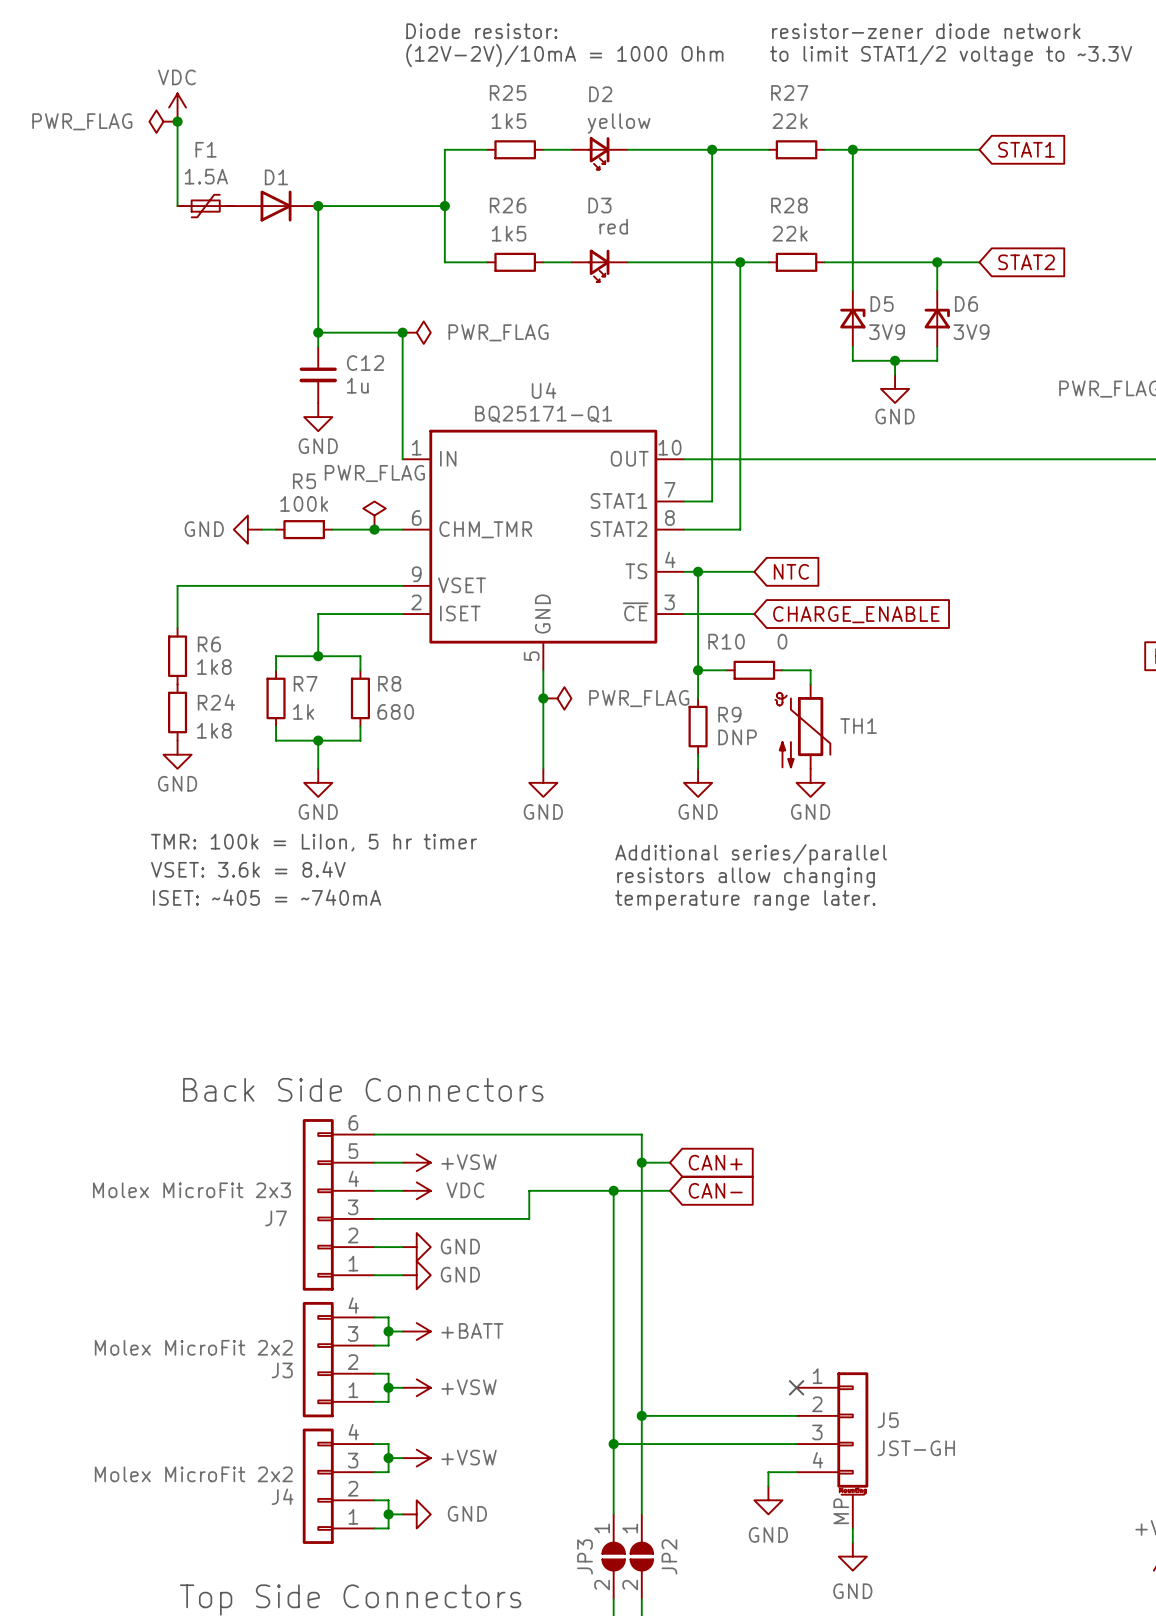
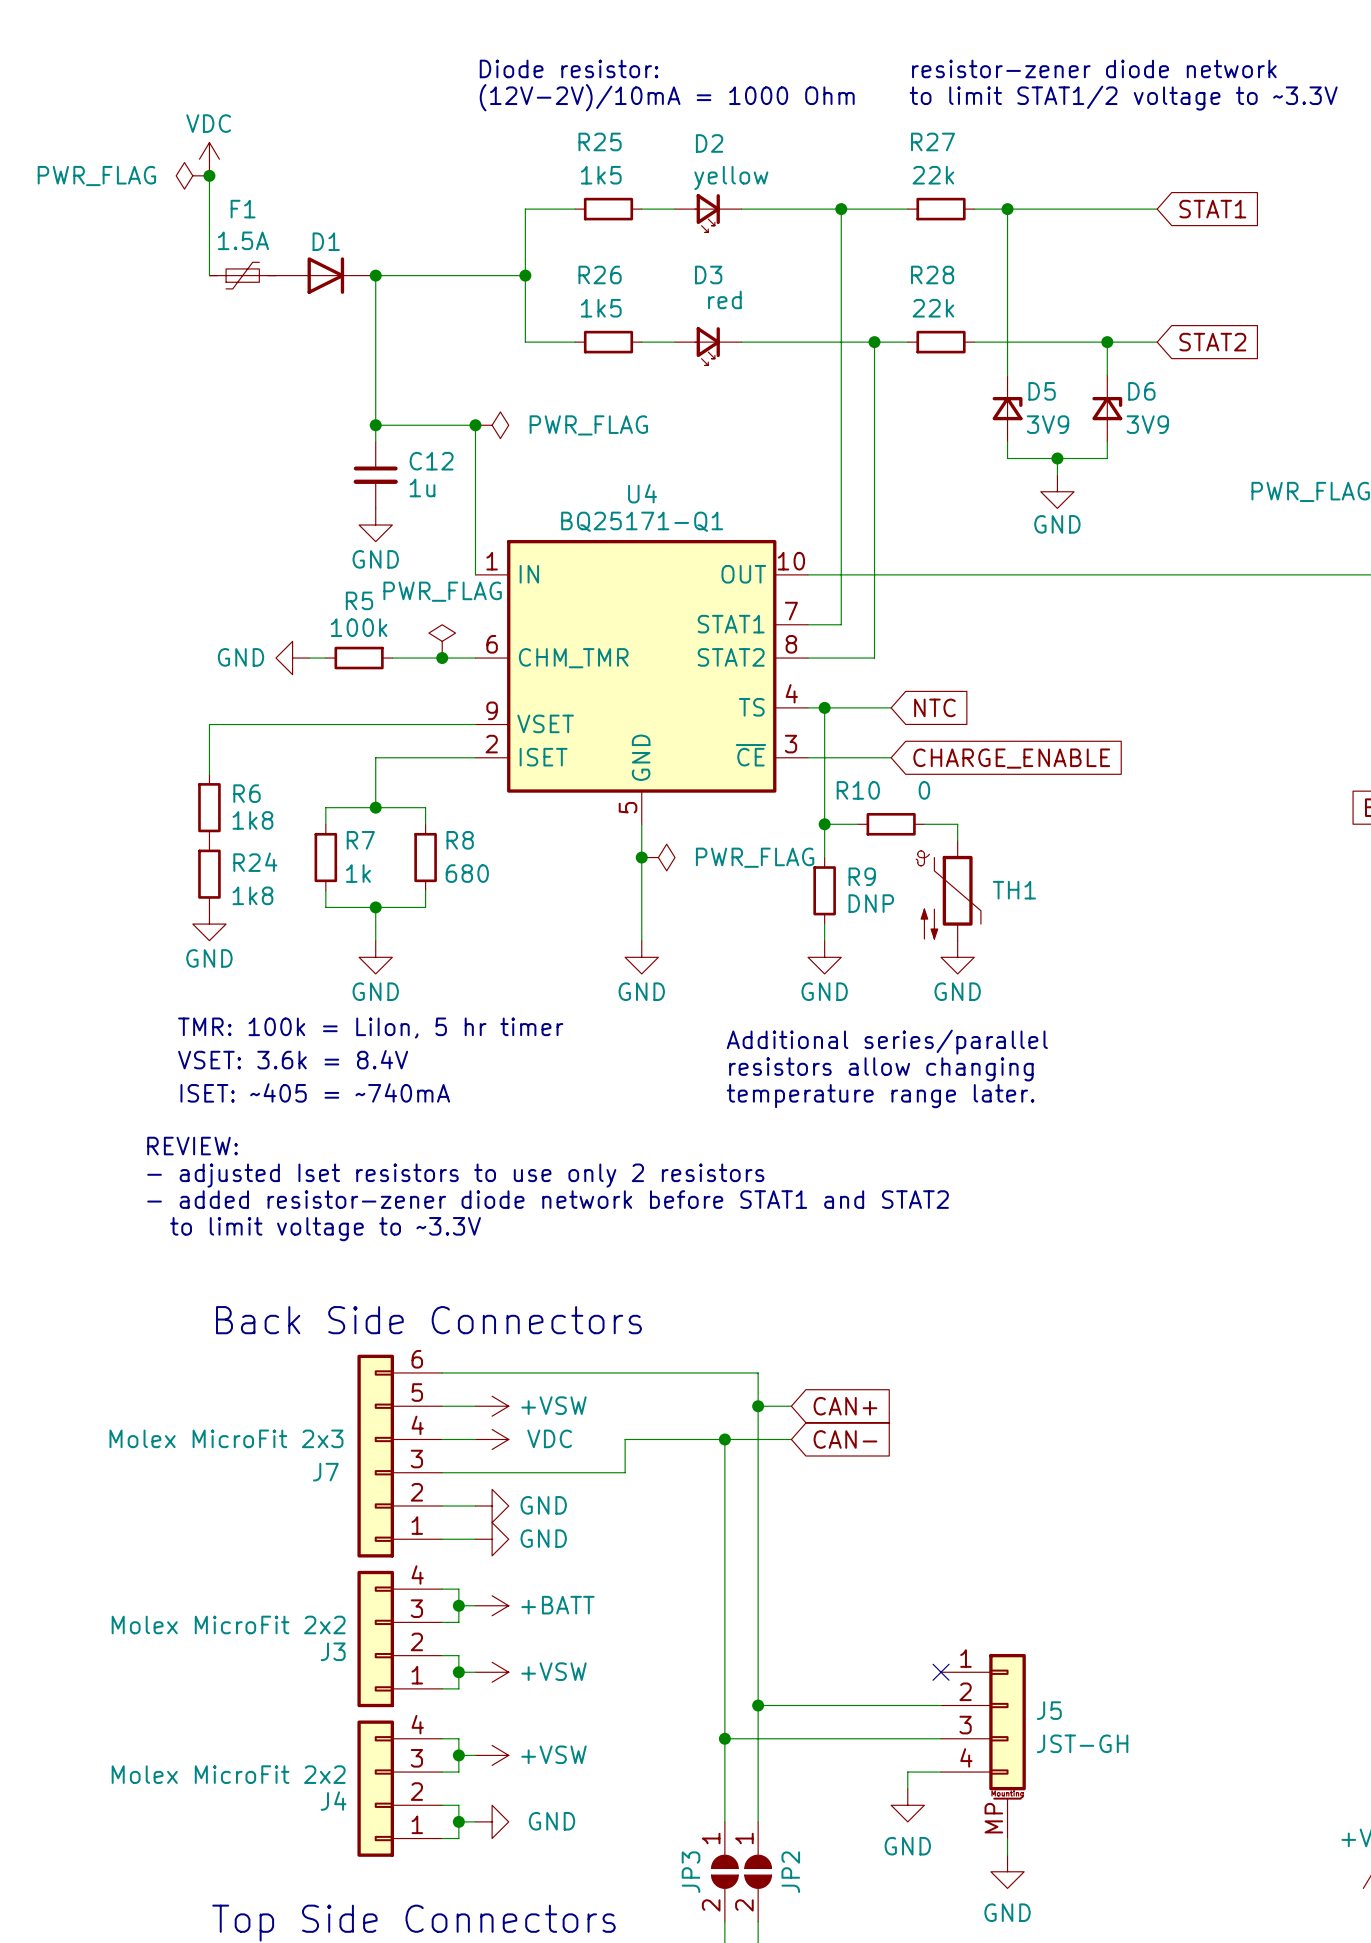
text: none -> REVIEW: (192, 1146)
text: none -> - adjusted Iset resistors to use only 2 resistors (455, 1175)
text: none -> - added resistor-zener diode network before STAT1 and STAT2 (548, 1199)
text: none -> to limit voltage to ~3.3V (325, 1229)

